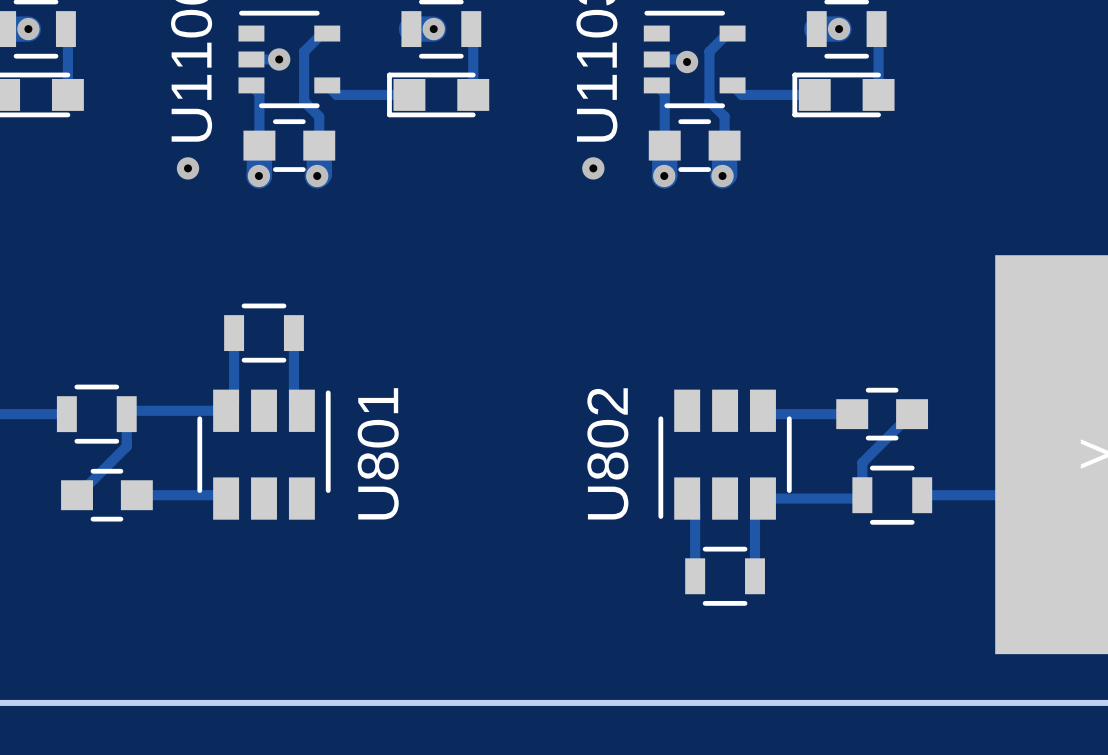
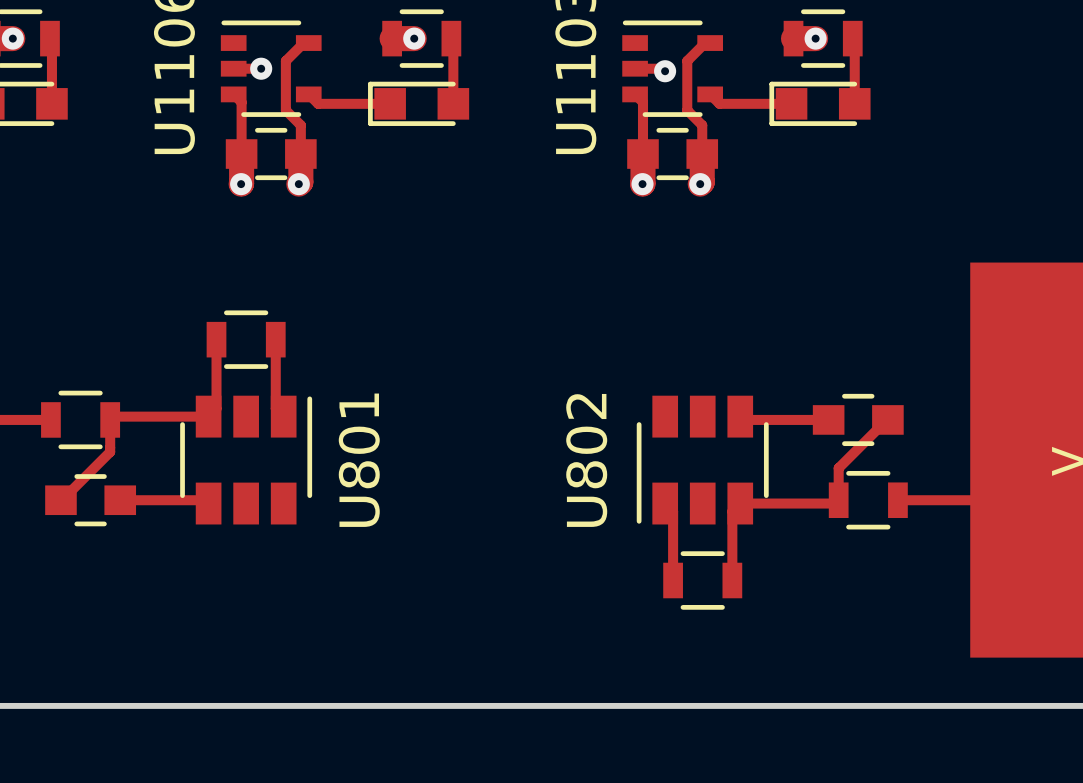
via: (188, 168) -> none
via: (593, 168) -> none

